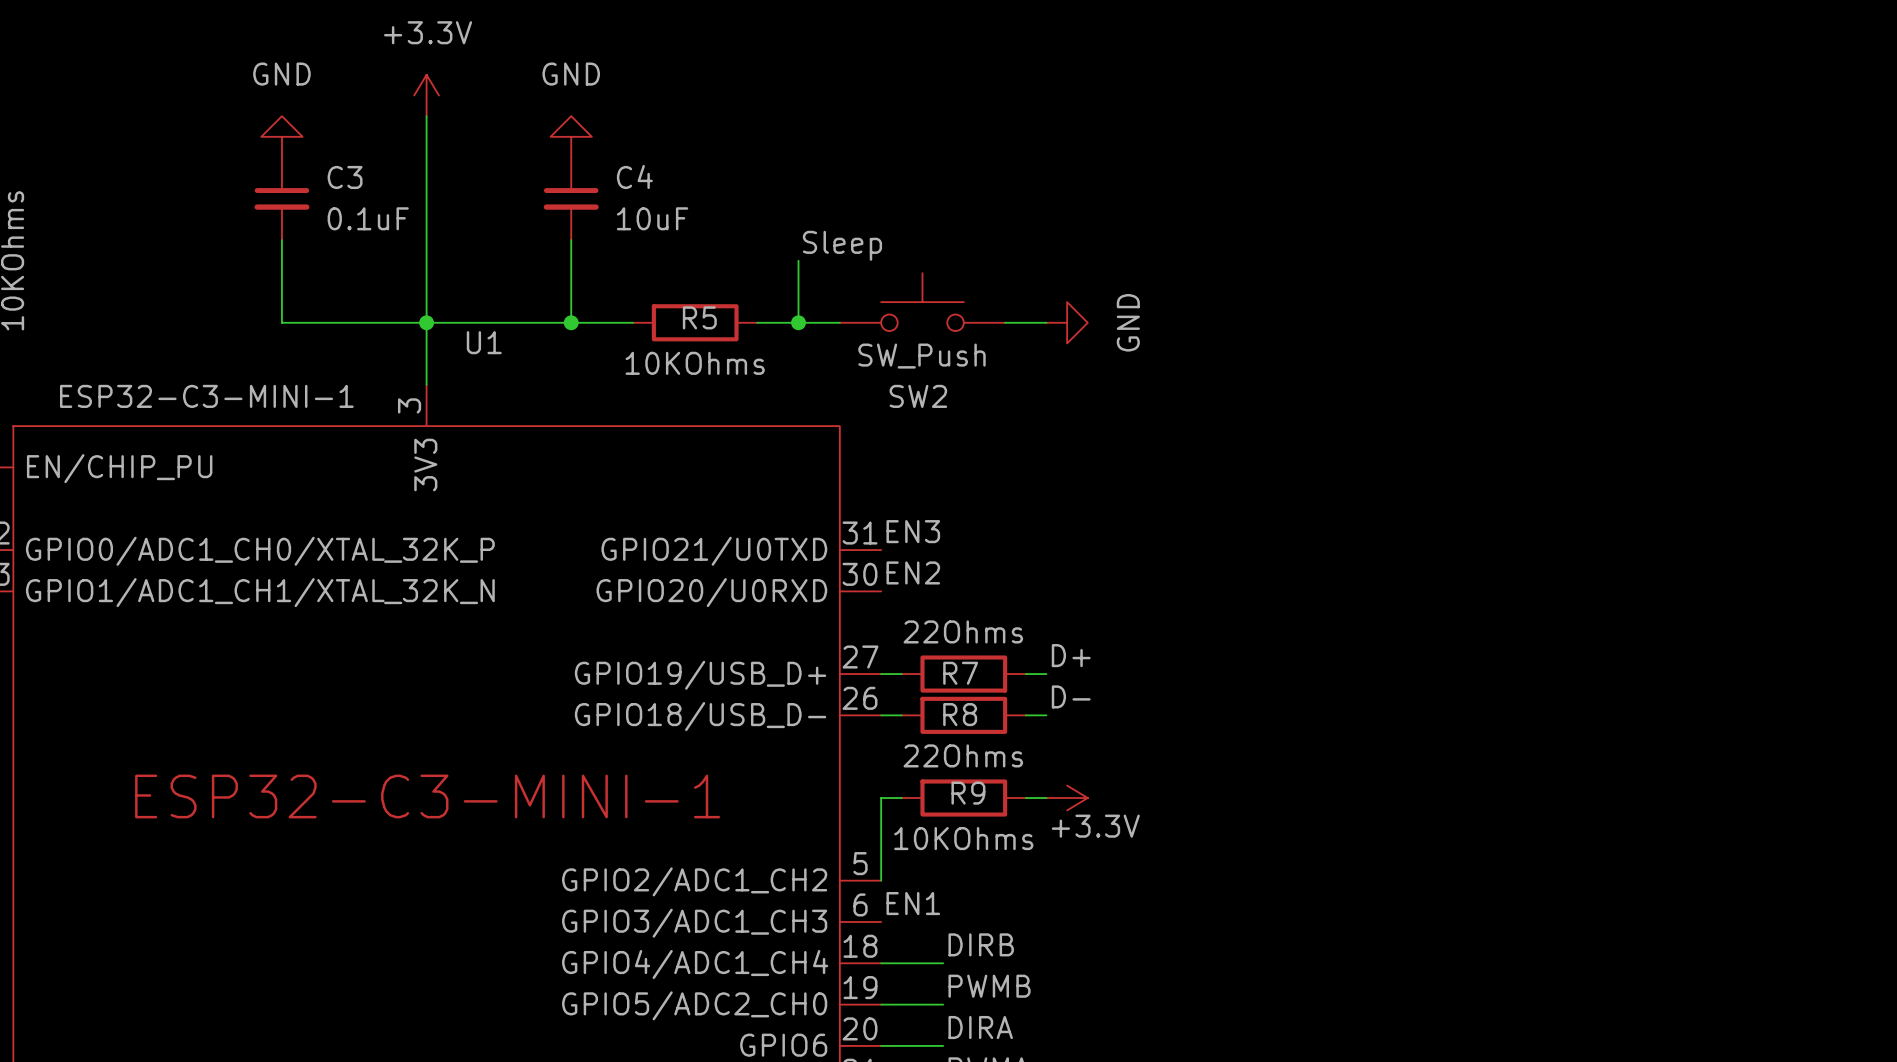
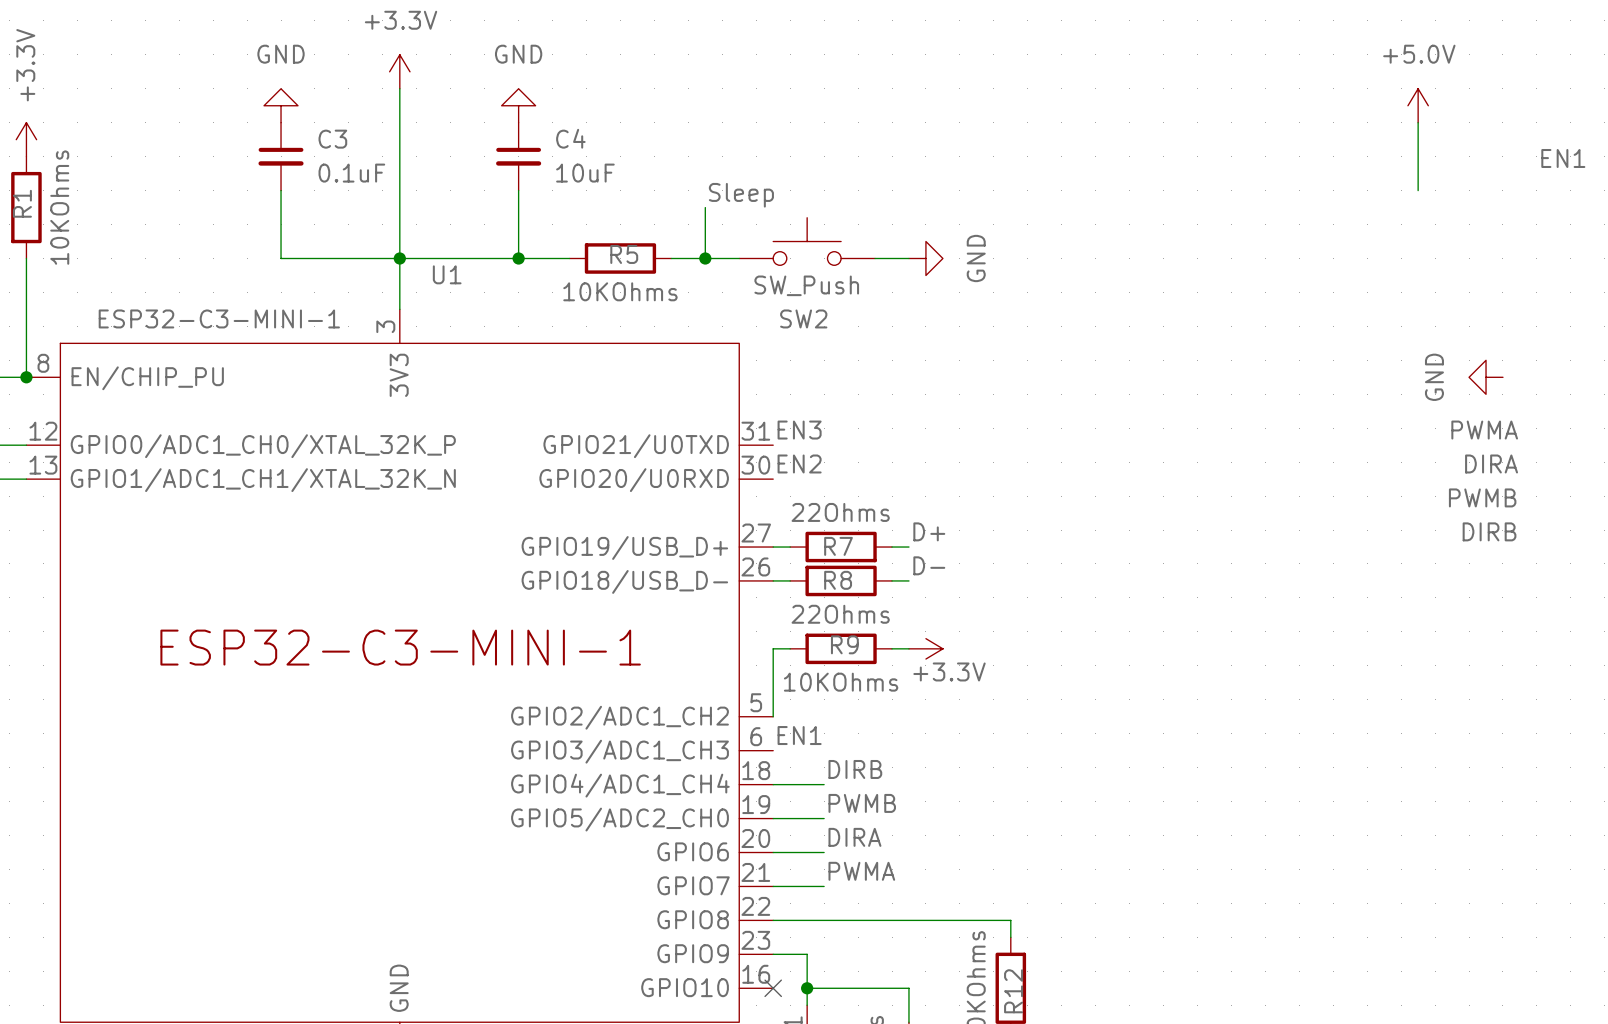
power symbol: none -> +5.0V (1418, 105)
wire: none -> (1418, 122) (1418, 190)
label: none -> EN1 (1563, 158)
power symbol: none -> GND (1486, 377)
label: none -> PWMA (1484, 430)
label: none -> DIRA (1491, 463)
label: none -> PWMB (1482, 497)
label: none -> DIRB (1489, 531)

